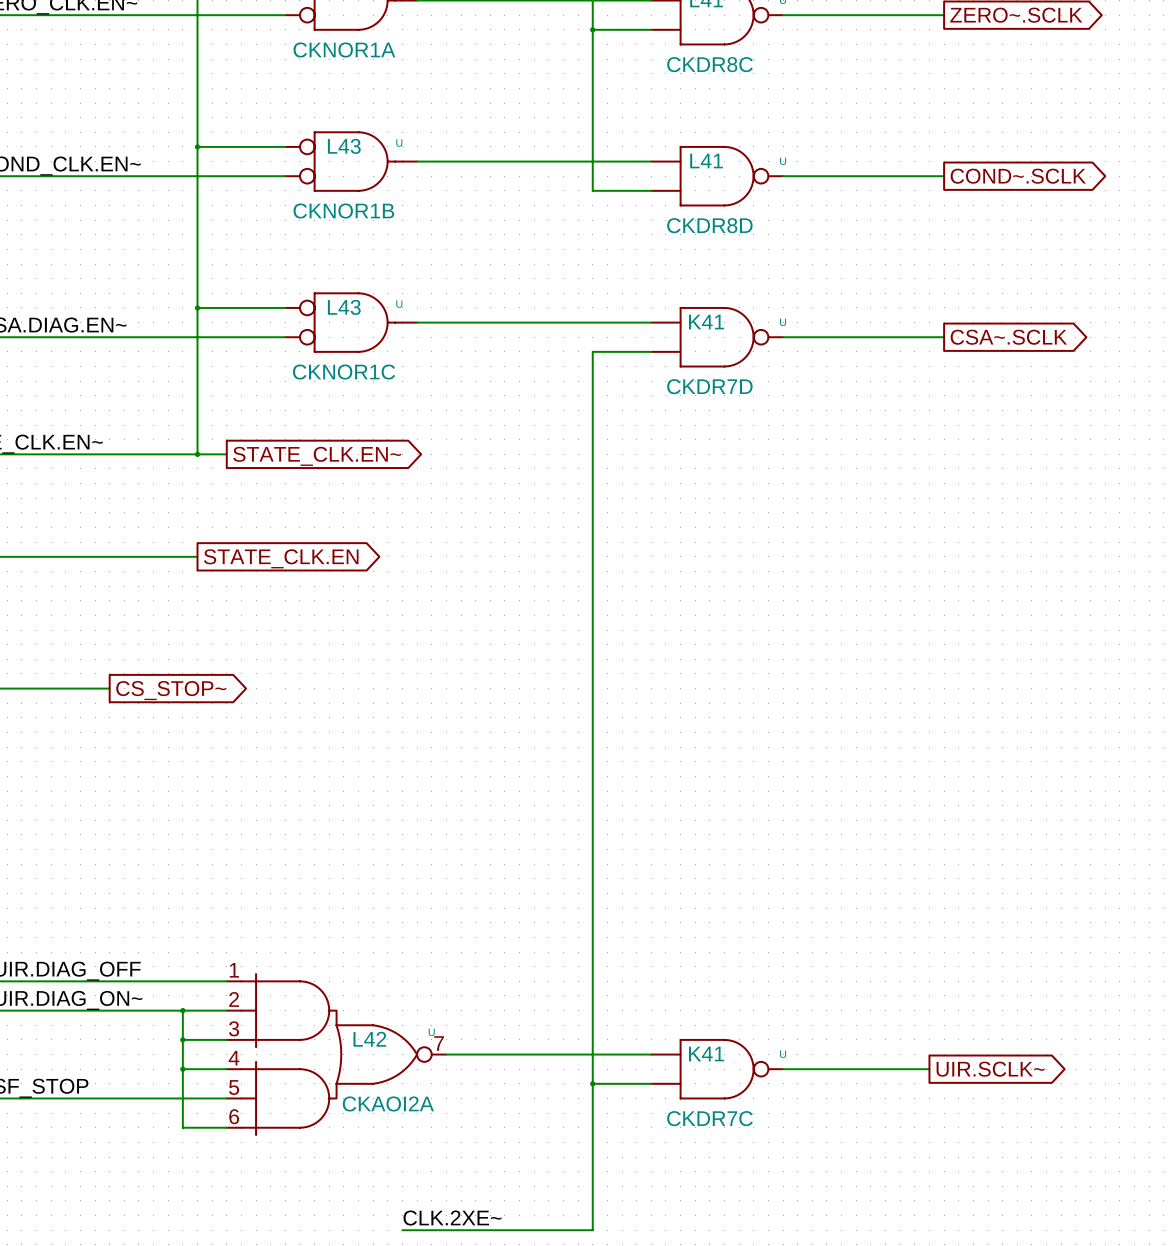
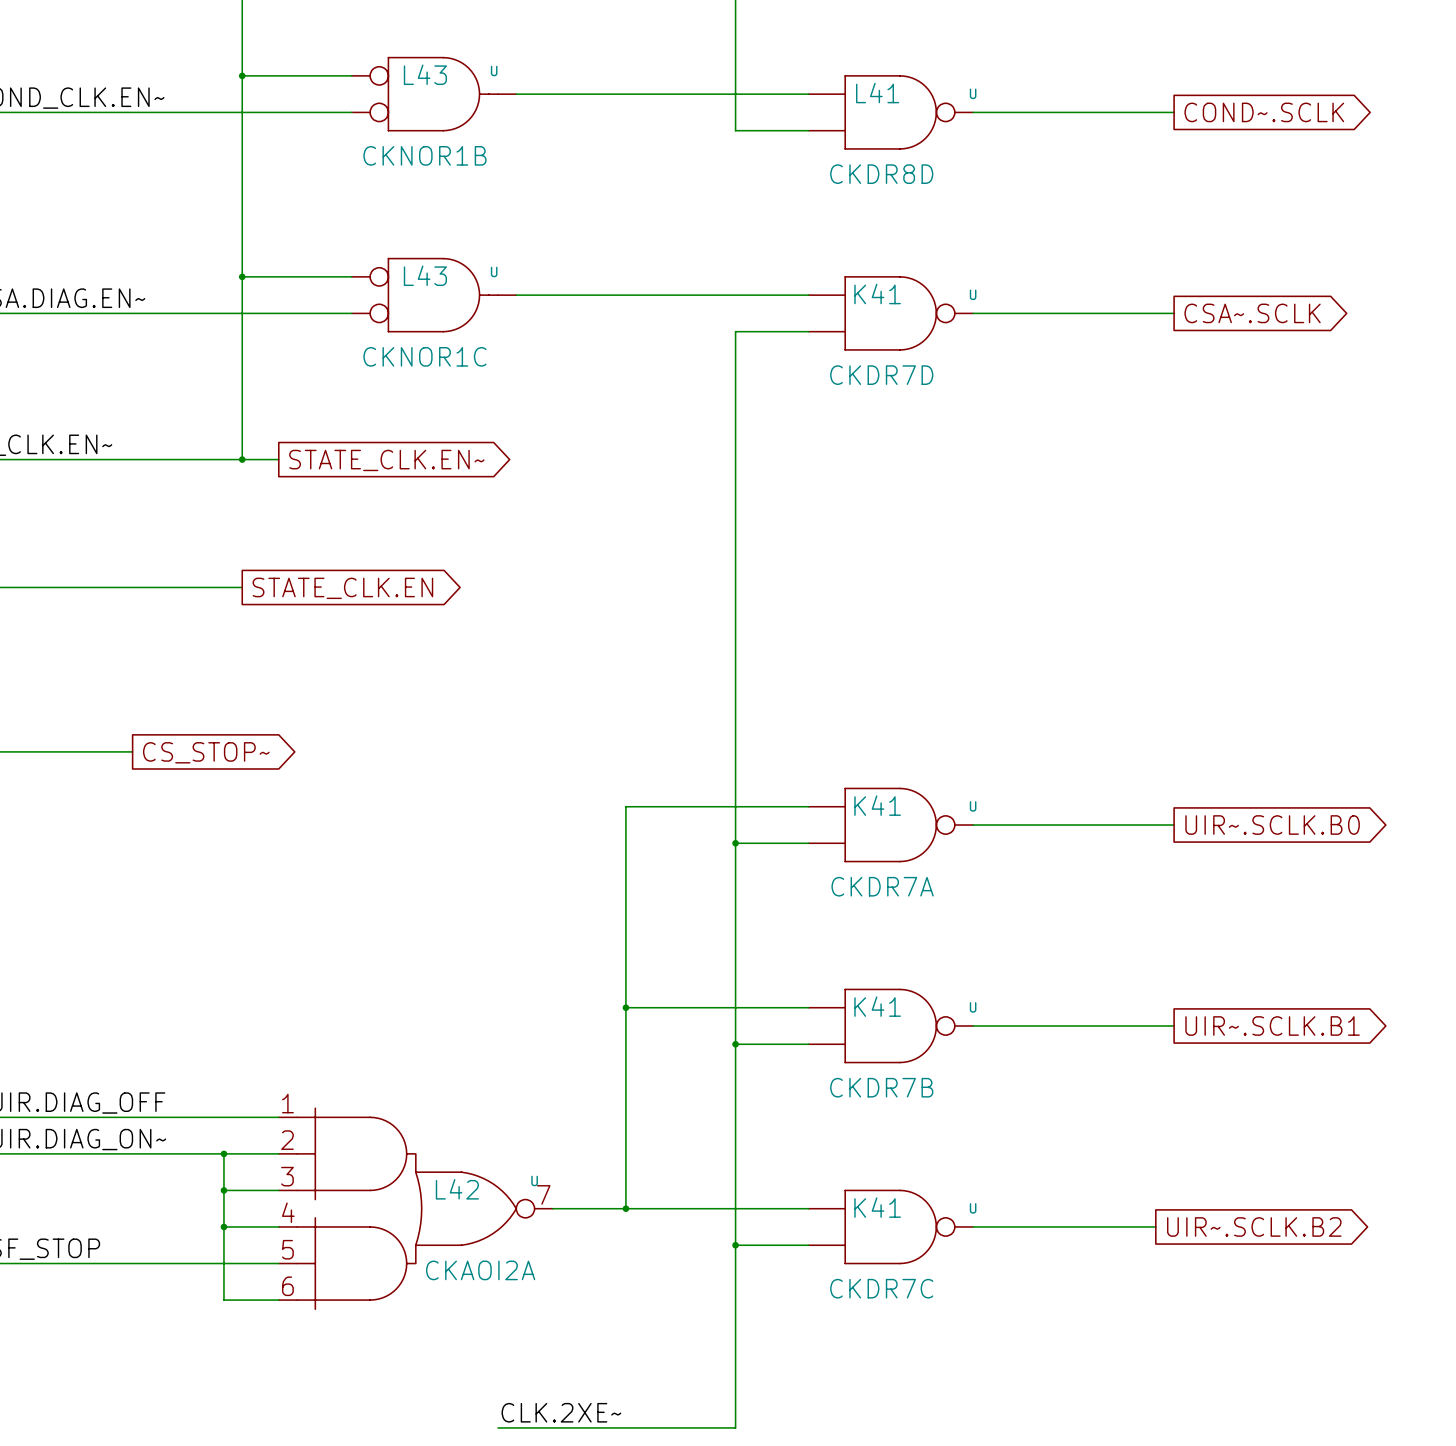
wire: none -> (808, 806) (625, 806) (625, 1208)
U: none -> (890, 825)
wire: none -> (973, 825) (1174, 825)
global label: none -> UIR~.SCLK.B0 (1272, 825)
wire: none -> (735, 843) (808, 843)
junction: none -> (735, 843)
wire: none -> (625, 1007) (808, 1007)
junction: none -> (625, 1007)
U: none -> (890, 1025)
wire: none -> (973, 1025) (1174, 1025)
global label: none -> UIR~.SCLK.B1 (1272, 1025)
wire: none -> (735, 1044) (808, 1044)
junction: none -> (735, 1044)
junction: none -> (625, 1208)
global label: UIR.SCLK~ (990, 1069) -> UIR~.SCLK.B2 (1254, 1226)

